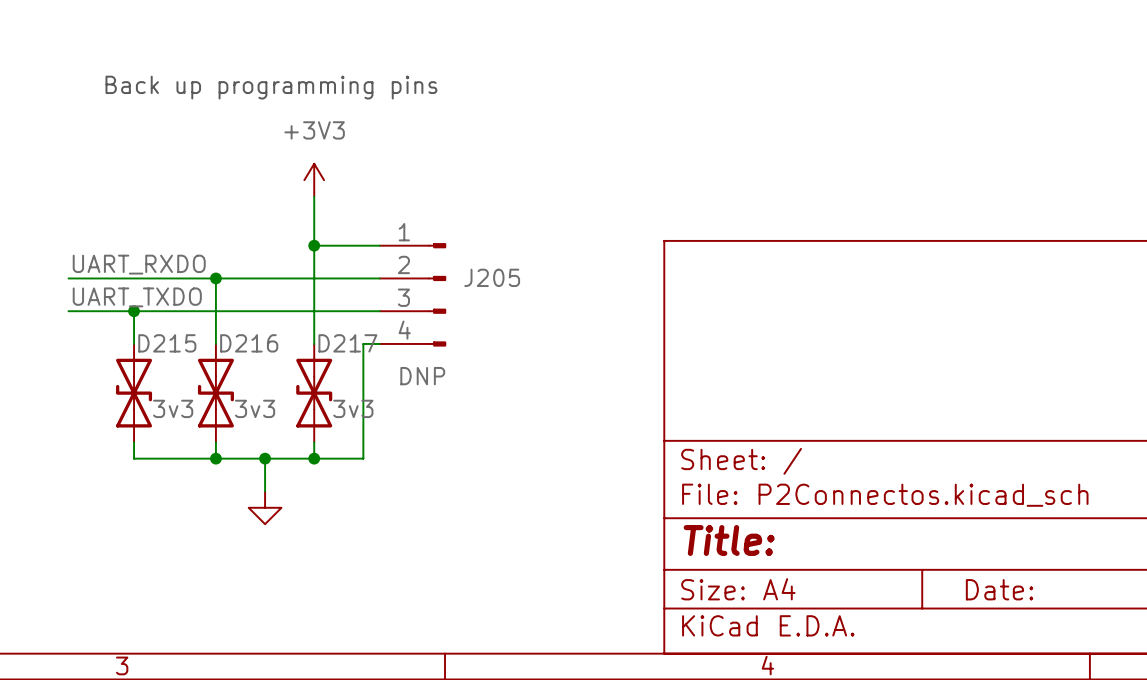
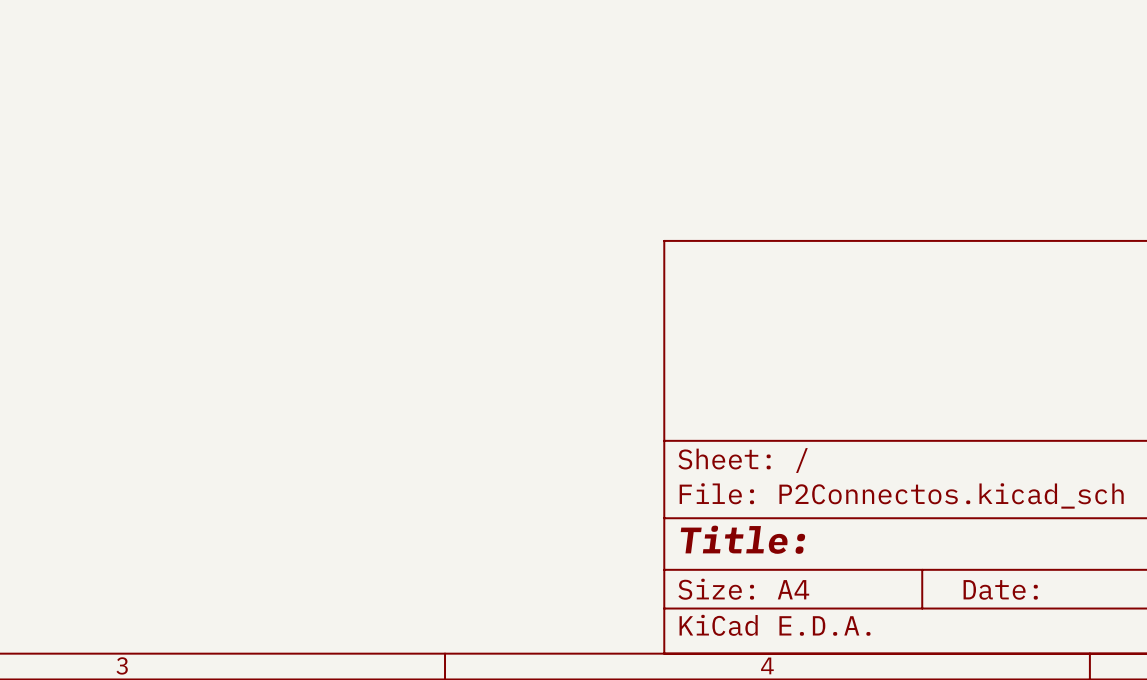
text: Back up programming pins (271, 87) -> none
power symbol: +3V3 (314, 180) -> none
wire: (314, 196) (314, 343) -> none
wire: (314, 245) (379, 245) -> none
junction: (314, 245) -> none
label: UART_RXDO (139, 264) -> none
wire: (68, 278) (379, 278) -> none
wire: (215, 278) (215, 343) -> none
junction: (215, 278) -> none
J205: DNP (412, 294) -> none
label: UART_TXDO (137, 297) -> none
wire: (68, 311) (379, 311) -> none
wire: (134, 311) (134, 343) -> none
junction: (134, 311) -> none
wire: (379, 343) (363, 343) (363, 458) (134, 458) (134, 442) -> none
D215: 3v3 (134, 393) -> none
D216: 3v3 (215, 393) -> none
D217: 3v3 (314, 393) -> none
wire: (215, 442) (215, 458) -> none
wire: (314, 442) (314, 458) -> none
junction: (215, 458) -> none
wire: (265, 458) (265, 491) -> none
junction: (265, 458) -> none
junction: (314, 458) -> none
power symbol: (265, 507) -> none

